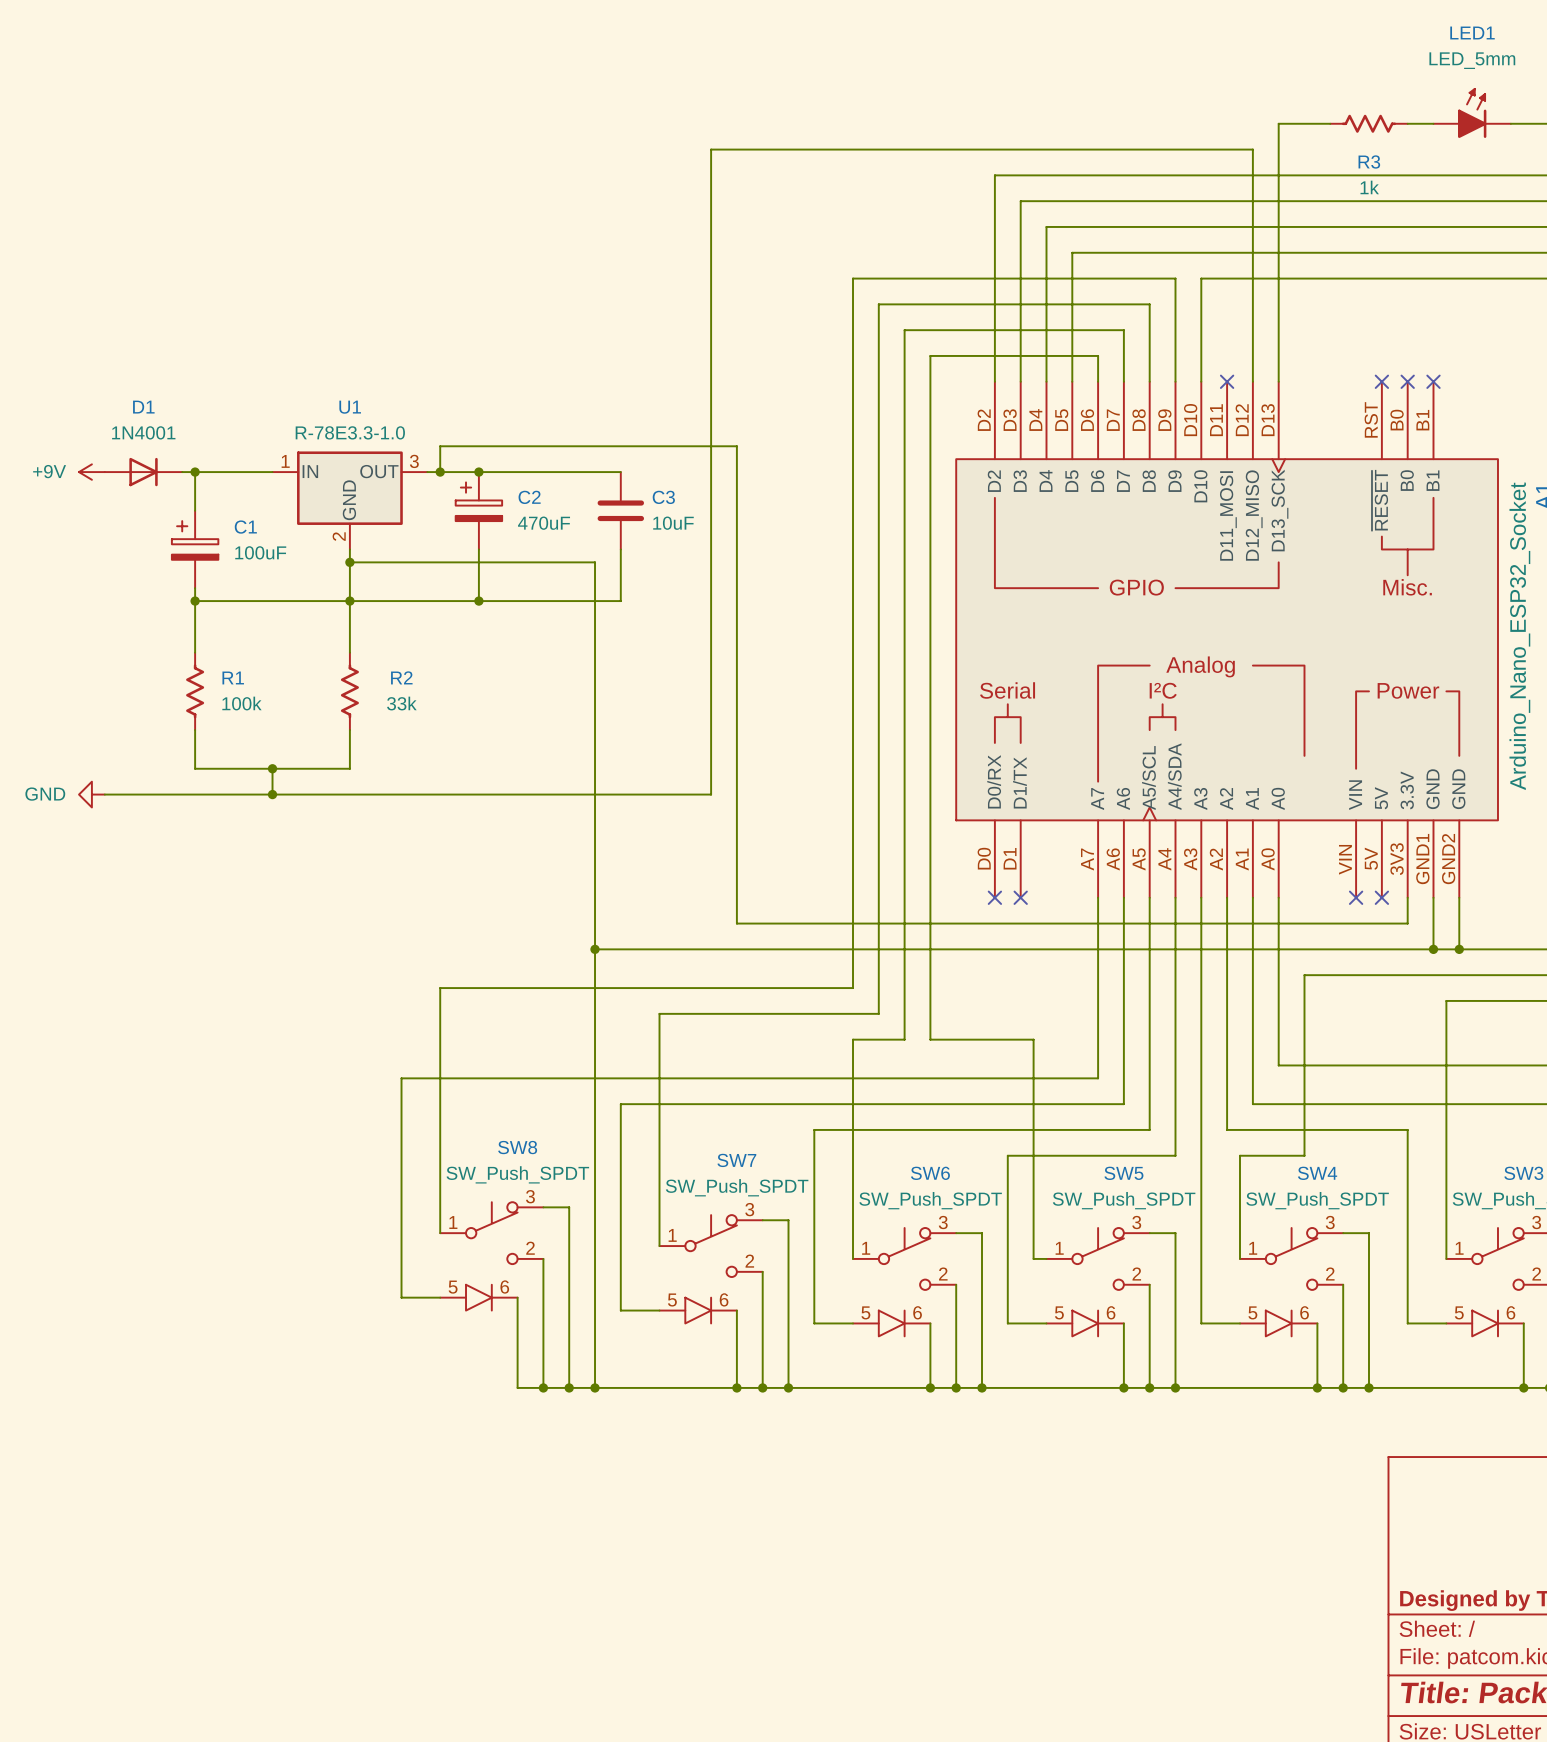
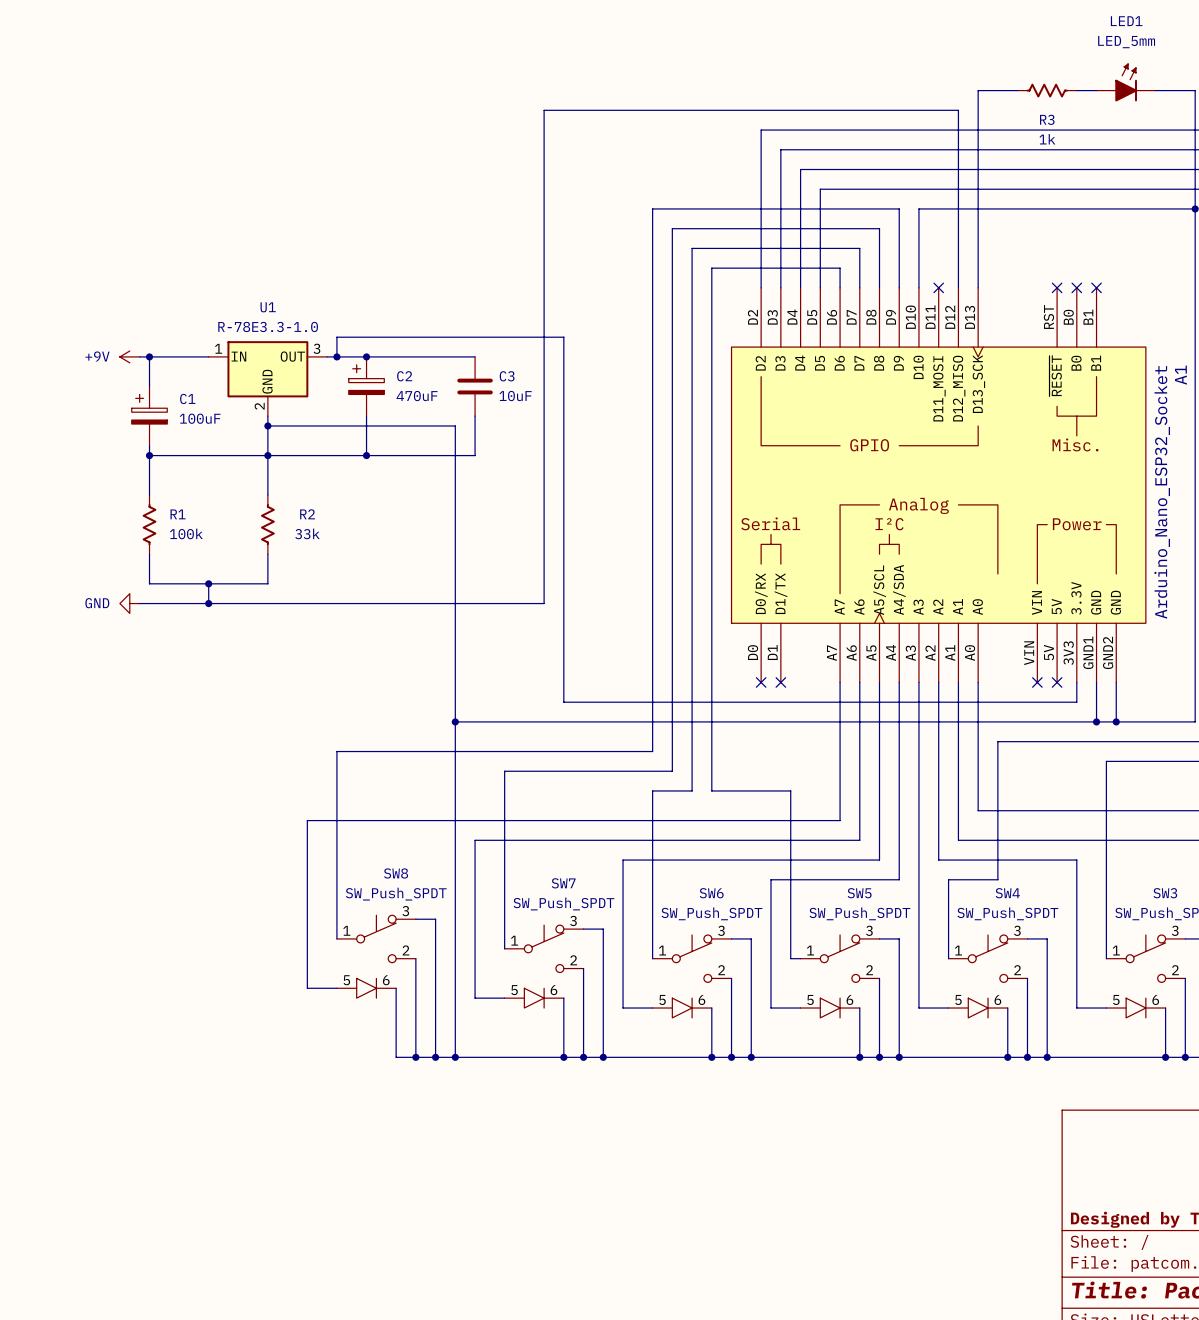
power symbol position: +9V (91, 472) -> +9V (129, 356)
D1: 1N4001 (143, 472) -> none
power symbol position: GND (91, 794) -> GND (129, 603)
wire: (104, 794) (182, 794) -> none

